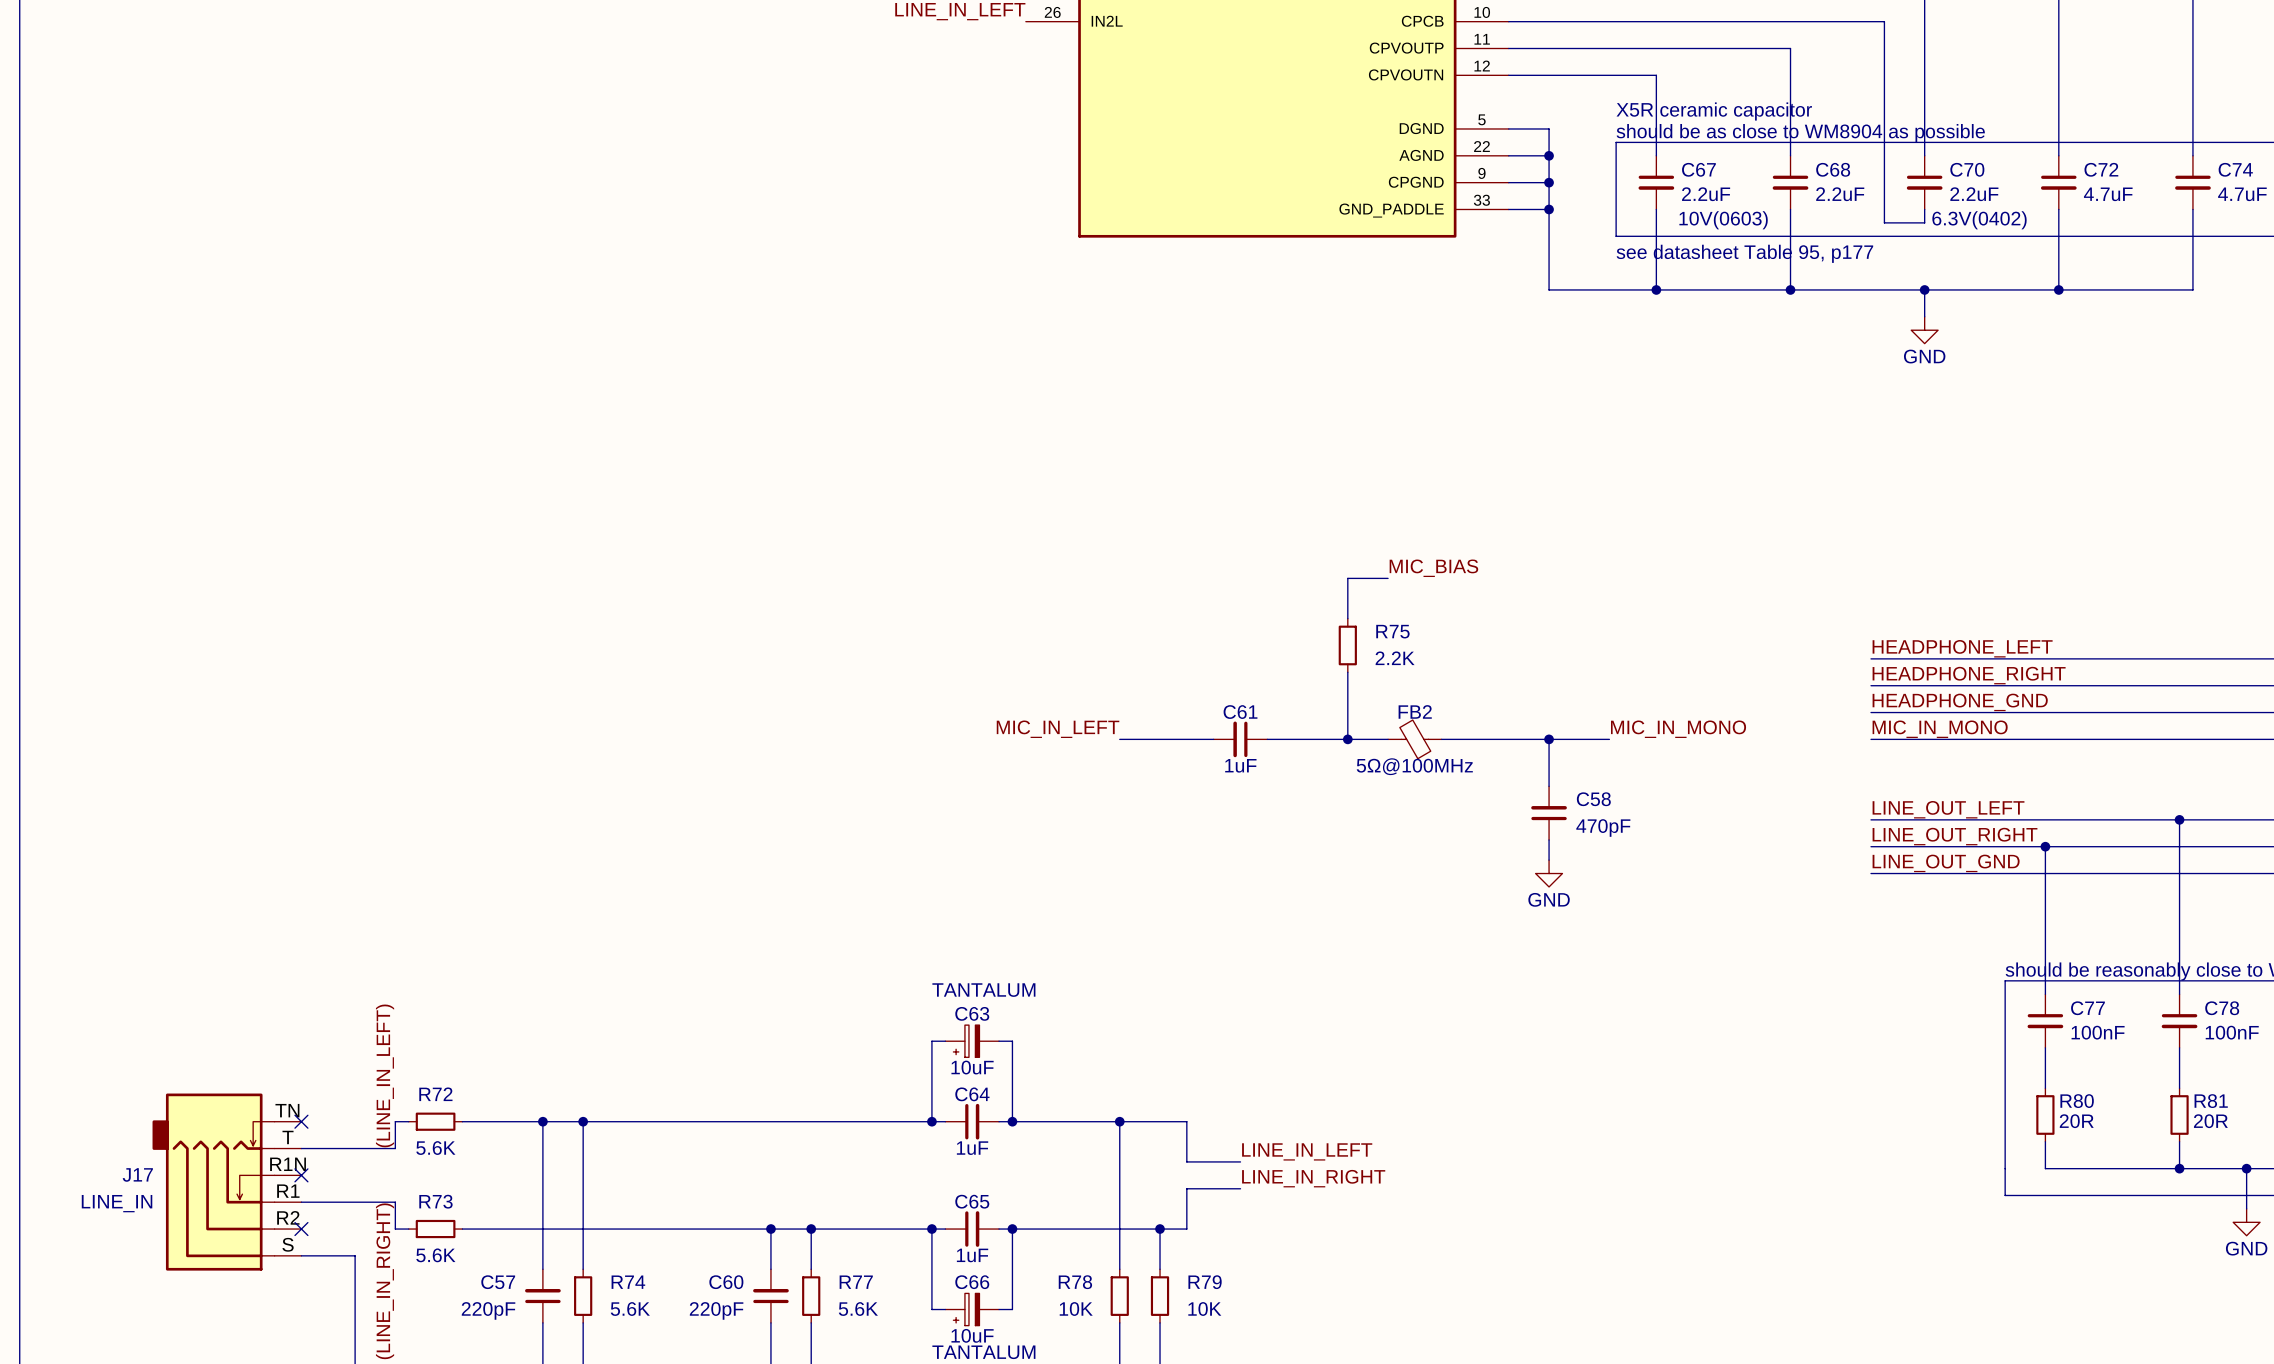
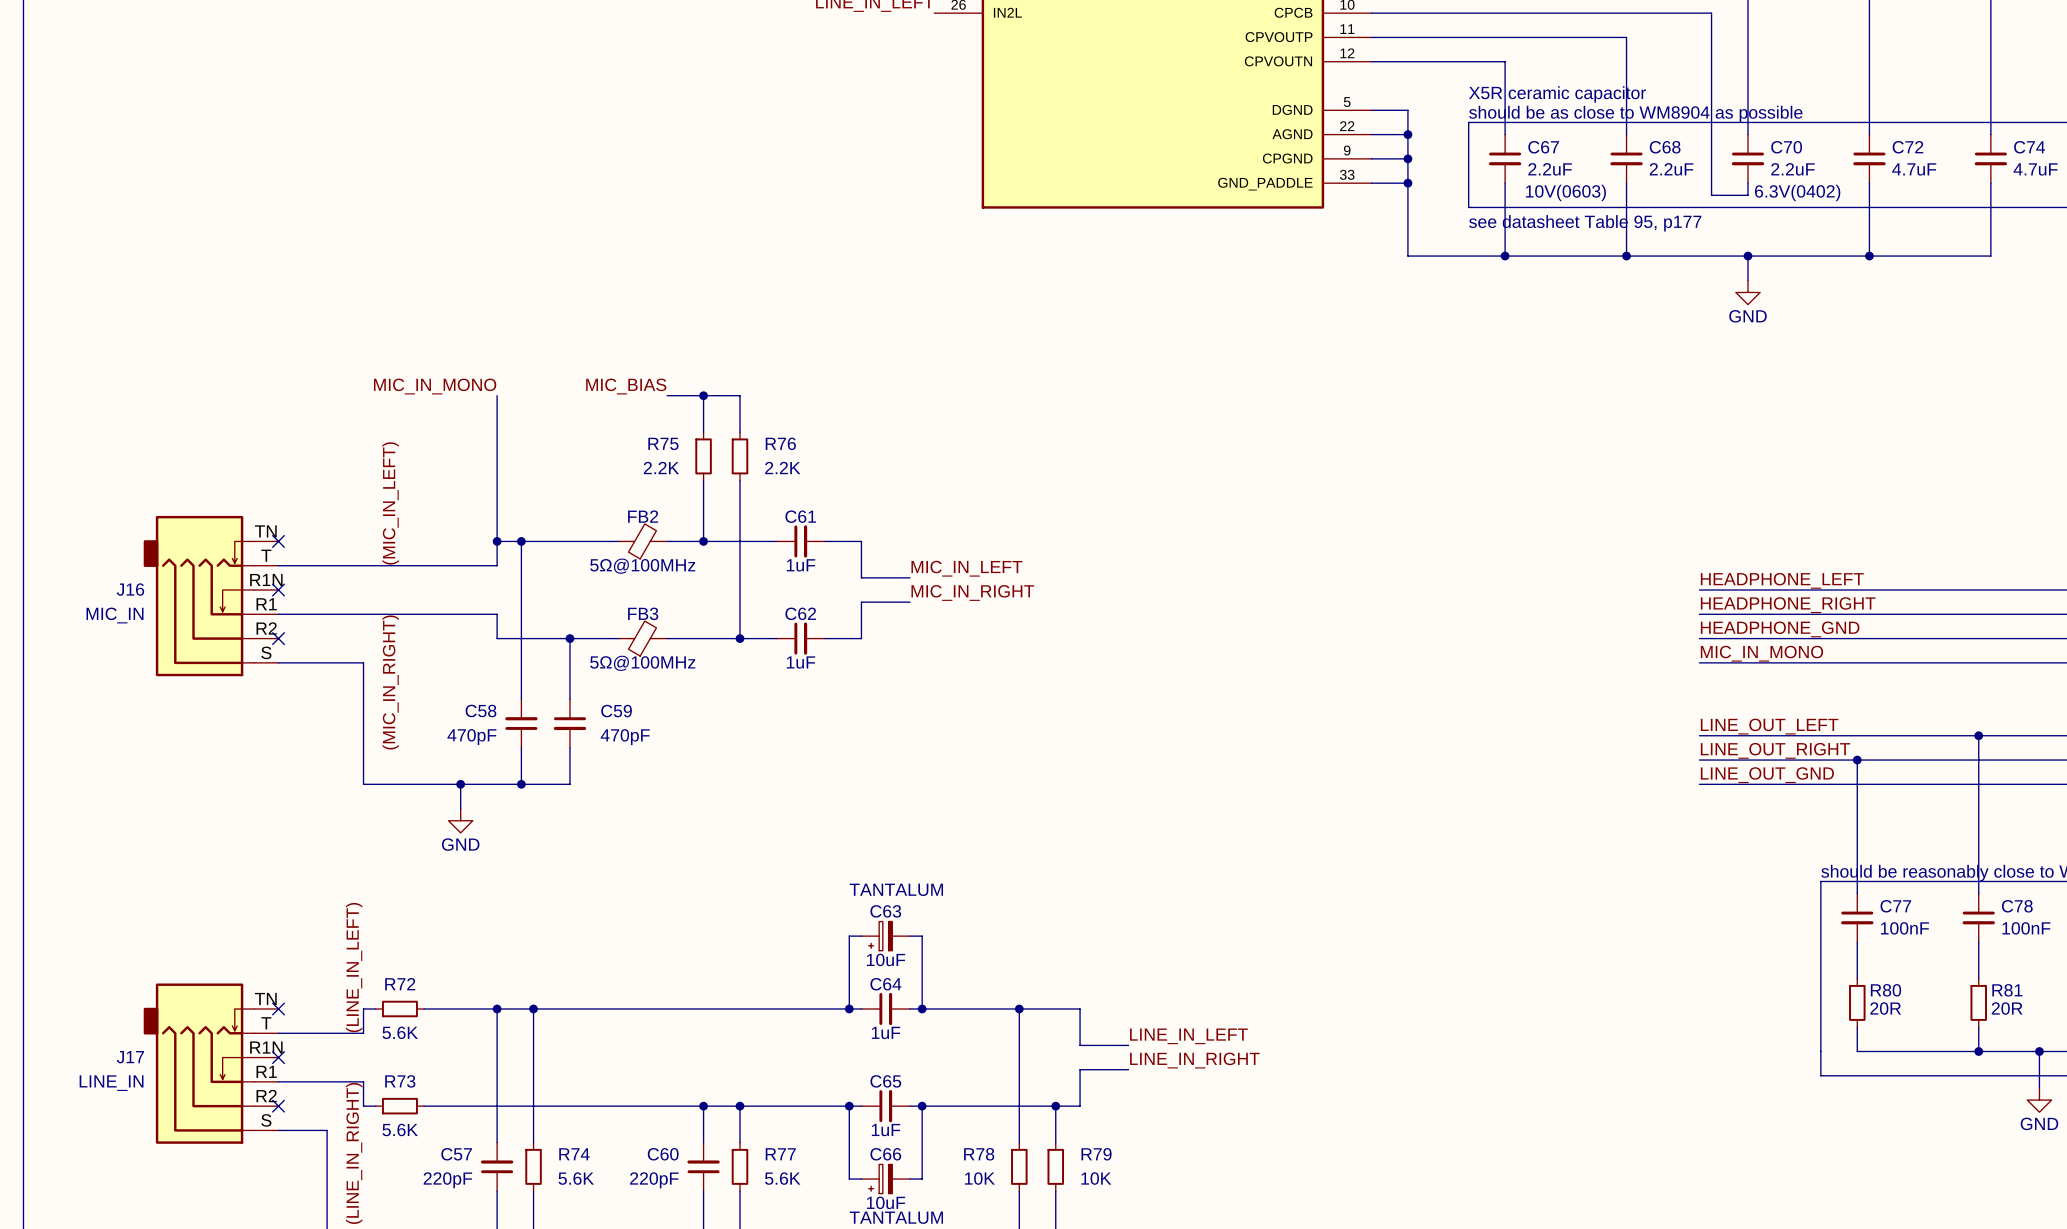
label: none -> MIC_IN_MONO (435, 386)
label: none -> MIC_BIAS (626, 386)
wire: none -> (497, 395) (497, 565) (278, 565)
wire: none -> (667, 395) (740, 395) (740, 432)
wire: none -> (703, 395) (703, 432)
junction: none -> (703, 395)
R76: none -> 2.2K (740, 456)
wire: none -> (703, 480) (703, 541)
wire: none -> (740, 480) (740, 638)
label: none -> (MIC_IN_LEFT) (390, 503)
label: MIC_BIAS (1433, 568) -> none
wire: (1388, 578) (1347, 578) (1347, 618) -> none
no-connect mark: none -> (278, 541)
wire: none -> (497, 541) (618, 541)
junction: none -> (497, 541)
wire: none -> (521, 541) (521, 699)
junction: none -> (521, 541)
wire: none -> (667, 541) (776, 541)
junction: none -> (703, 541)
wire: none -> (825, 541) (861, 541) (861, 577) (910, 577)
R75 name position: R75 (1392, 631) -> R75 (663, 443)
R75 position: (1347, 645) -> (703, 456)
no-connect mark: none -> (278, 590)
R75 value position: 2.2K (1395, 658) -> 2.2K (661, 468)
label: none -> MIC_IN_RIGHT (972, 592)
J16: none -> MIC_IN (211, 596)
wire: none -> (910, 602) (861, 602) (861, 638) (825, 638)
wire: (1347, 672) (1347, 739) -> none
wire: none -> (278, 614) (497, 614) (497, 638) (618, 638)
no-connect mark: none -> (278, 638)
wire: none -> (569, 638) (569, 699)
junction: none -> (569, 638)
FB3: none -> 5Ω@100MHz (642, 638)
wire: none -> (667, 638) (776, 638)
junction: none -> (740, 638)
C62: none -> 1uF (800, 638)
label position: MIC_IN_LEFT (1058, 729) -> MIC_IN_LEFT (966, 568)
label: MIC_IN_MONO (1678, 729) -> none
wire: none -> (278, 662) (363, 662) (363, 784) (569, 784) (569, 747)
wire: (1119, 739) (1213, 739) -> none
C61 rotation: 0° (1240, 739) -> 180° (800, 541)
C61 position: (1240, 739) -> (800, 541)
wire: (1267, 739) (1388, 739) -> none
junction: (1347, 739) -> none
FB2 position: (1414, 739) -> (642, 541)
FB2 flip: as is (1415, 739) -> left-right (642, 541)
wire: (1441, 739) (1609, 739) -> none
wire: (1549, 739) (1549, 786) -> none
junction: (1549, 739) -> none
label: none -> (MIC_IN_RIGHT) (390, 682)
C58 name position: C58 (1593, 799) -> C58 (480, 710)
C59: none -> 470pF (569, 723)
C58 position: (1549, 813) -> (521, 723)
C58 value position: 470pF (1603, 827) -> 470pF (471, 737)
wire: none -> (521, 747) (521, 784)
wire: (1549, 839) (1549, 860) -> none
wire: none -> (460, 784) (460, 808)
junction: none -> (460, 784)
junction: none -> (521, 784)
power symbol: GND (1549, 873) -> none
power symbol: none -> GND (460, 820)

